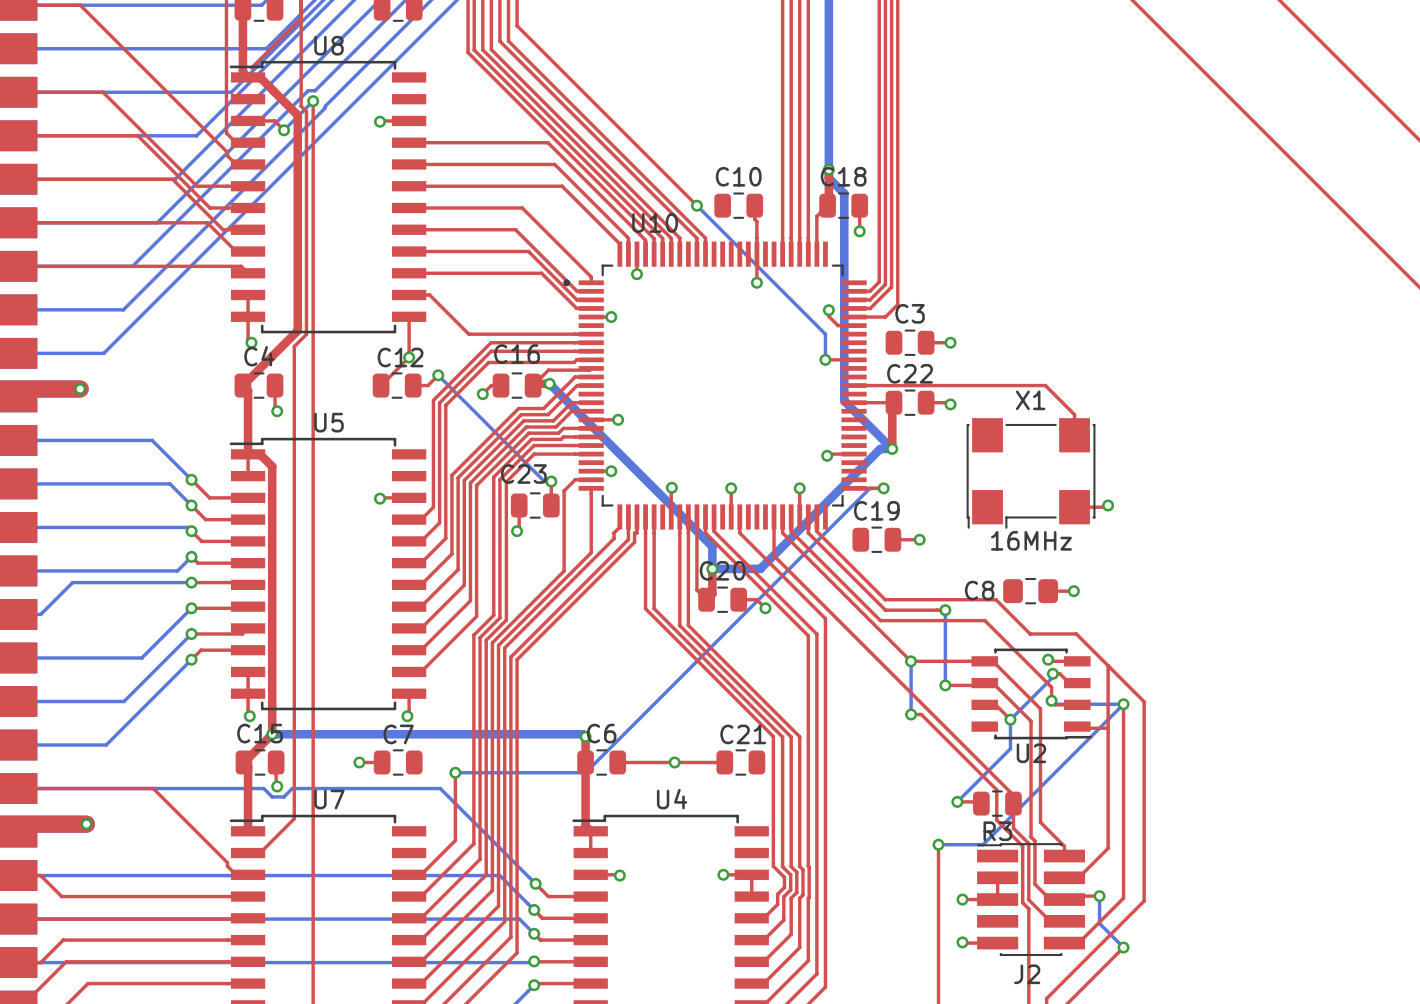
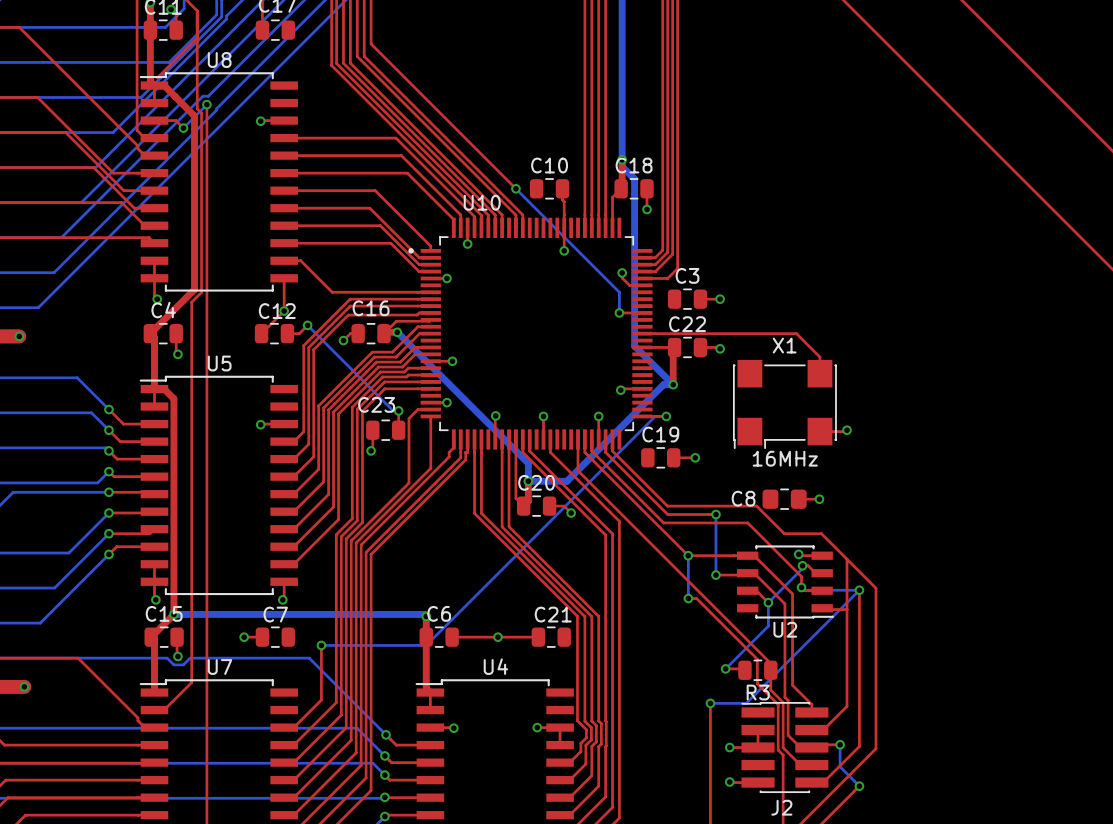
top track: none -> (154, 85) (154, 103)

